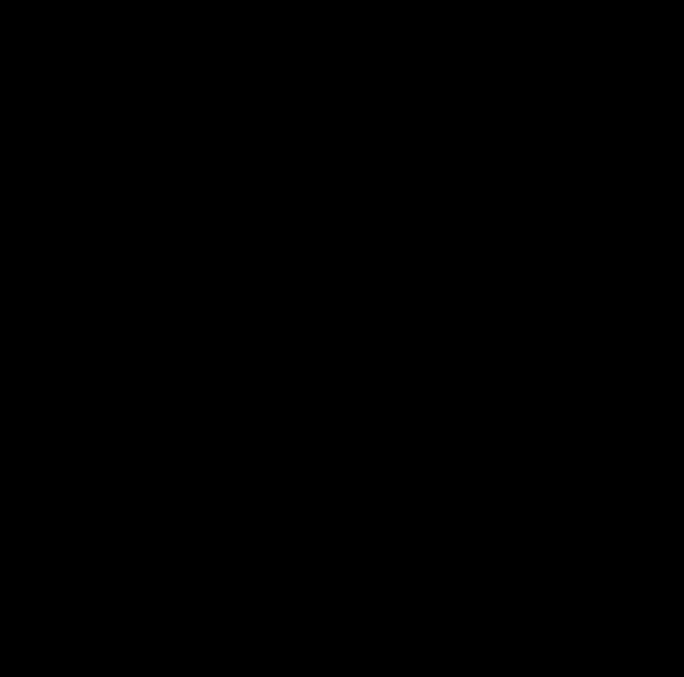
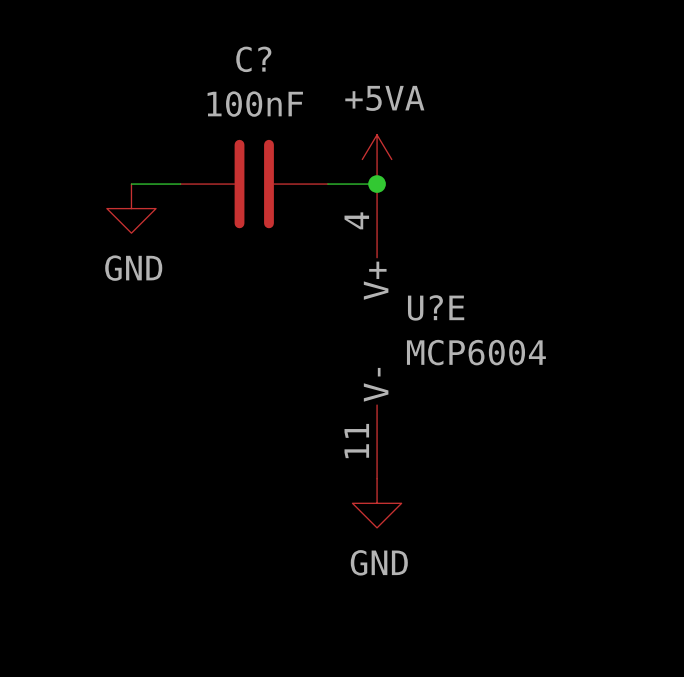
power symbol: none -> +5VA (377, 159)
wire: none -> (131, 184) (180, 184)
C?: none -> 100nF (254, 184)
wire: none -> (327, 184) (377, 184)
junction: none -> (377, 184)
power symbol: none -> GND (131, 208)
U?E: none -> MCP6004 (377, 331)
power symbol: none -> GND (377, 503)

